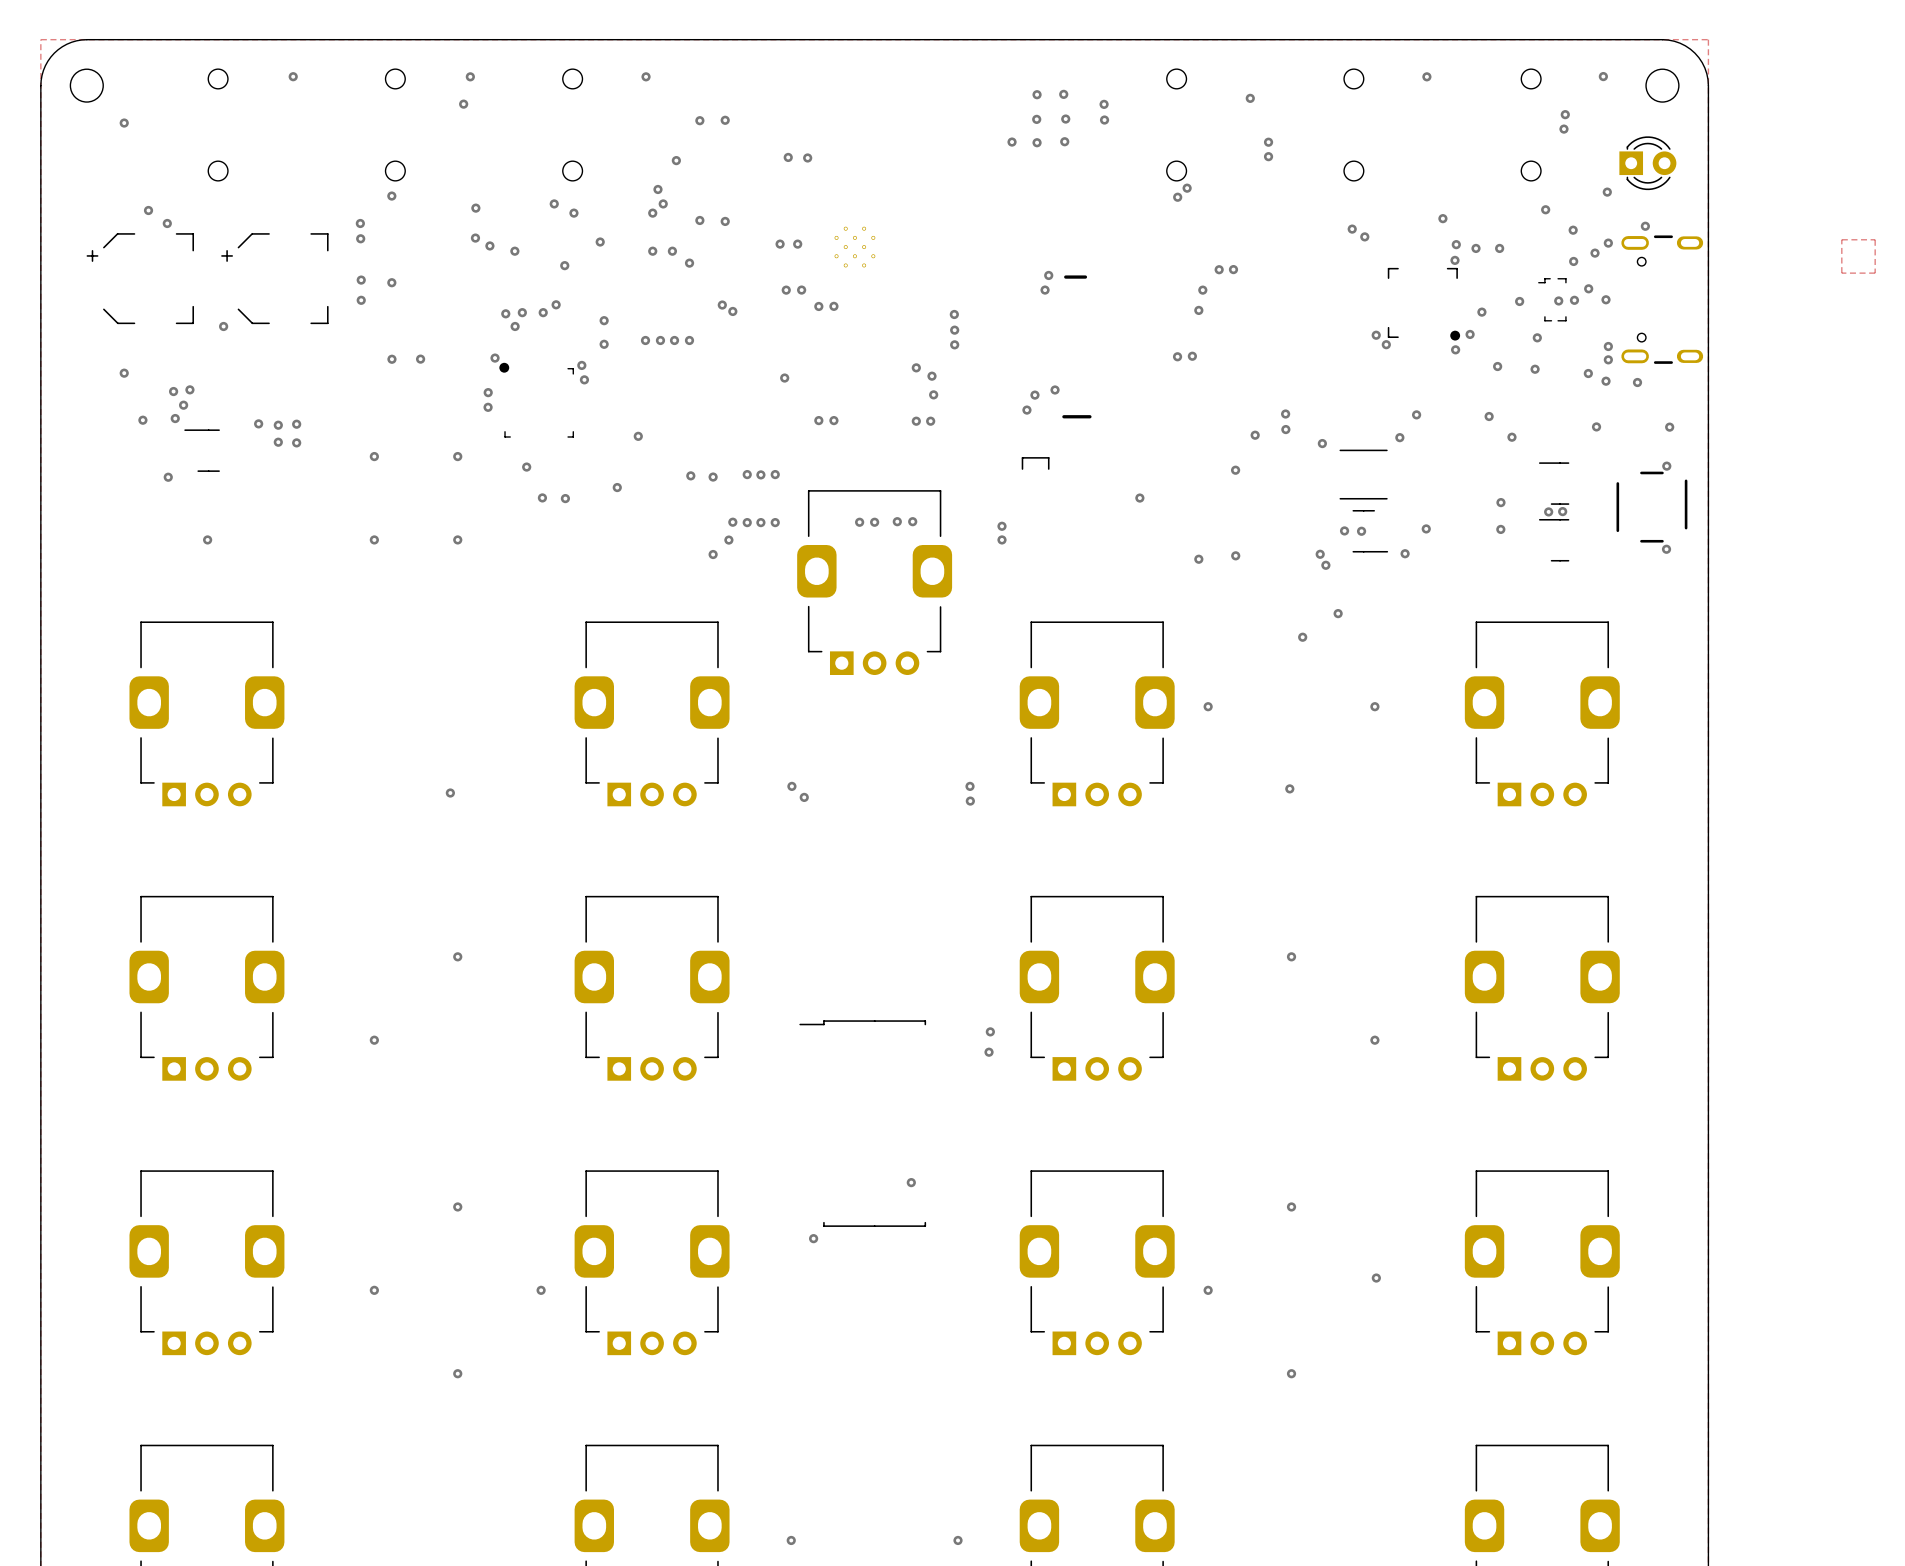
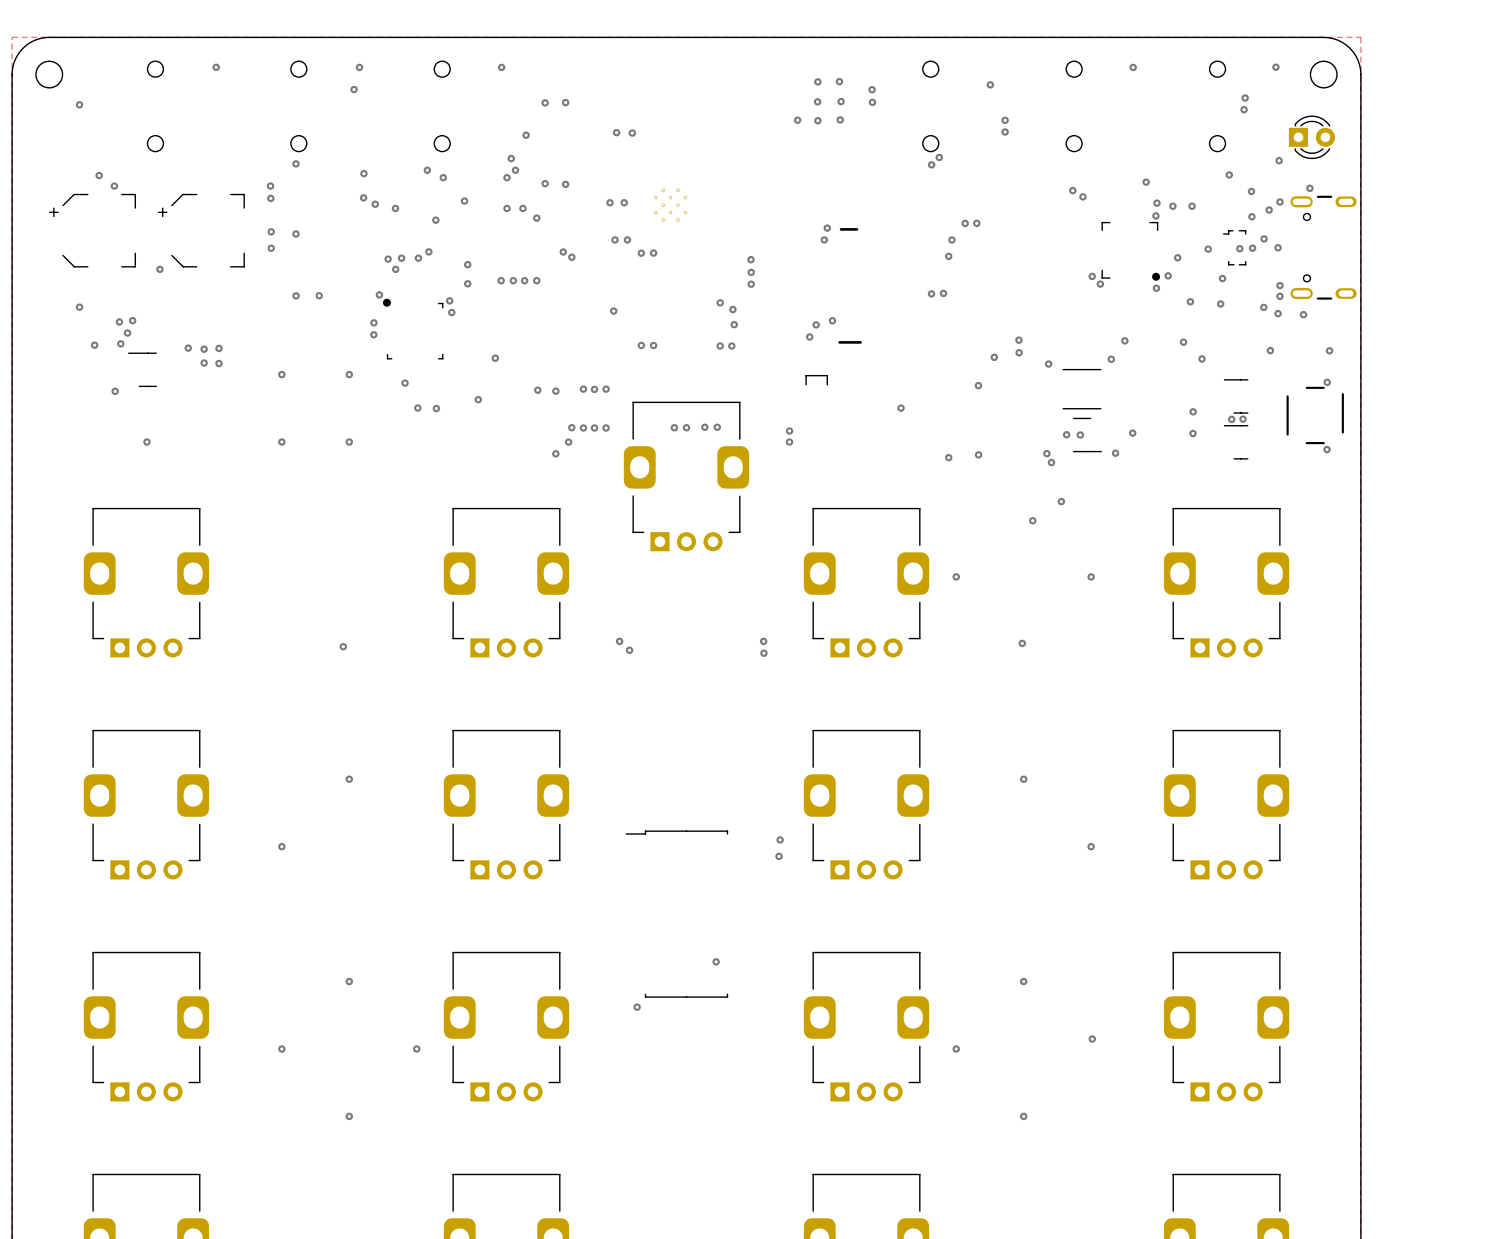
zone outline: (1841, 239) (1841, 273) (1875, 273) (1875, 239) (1841, 239) -> none

